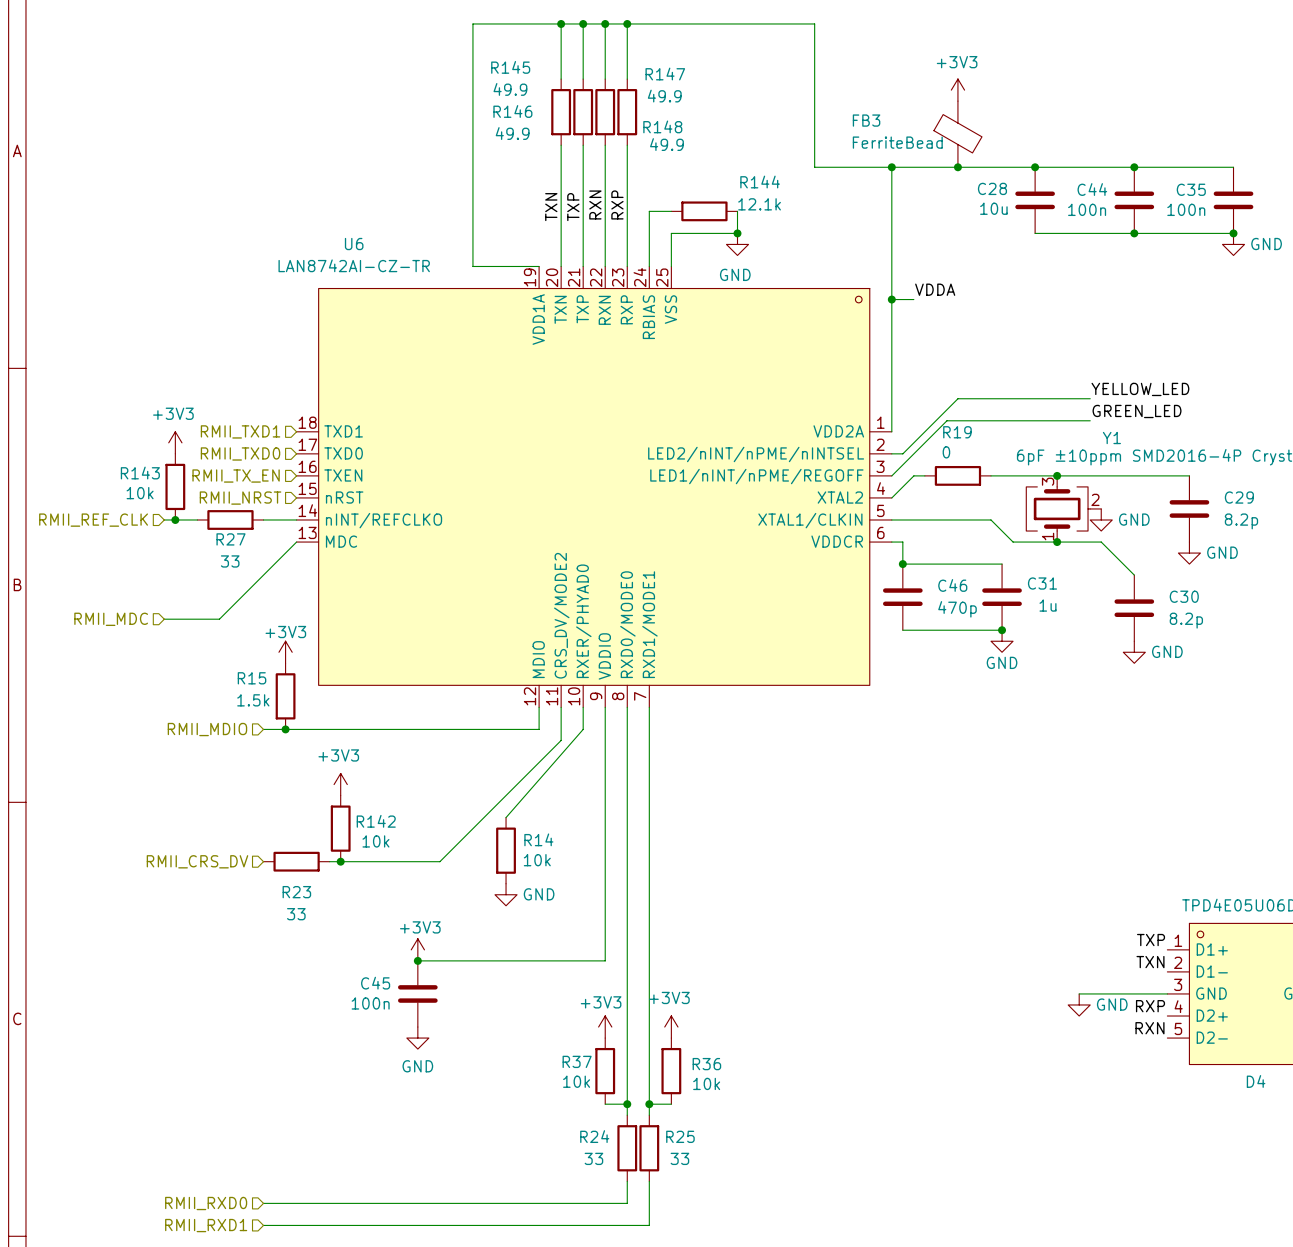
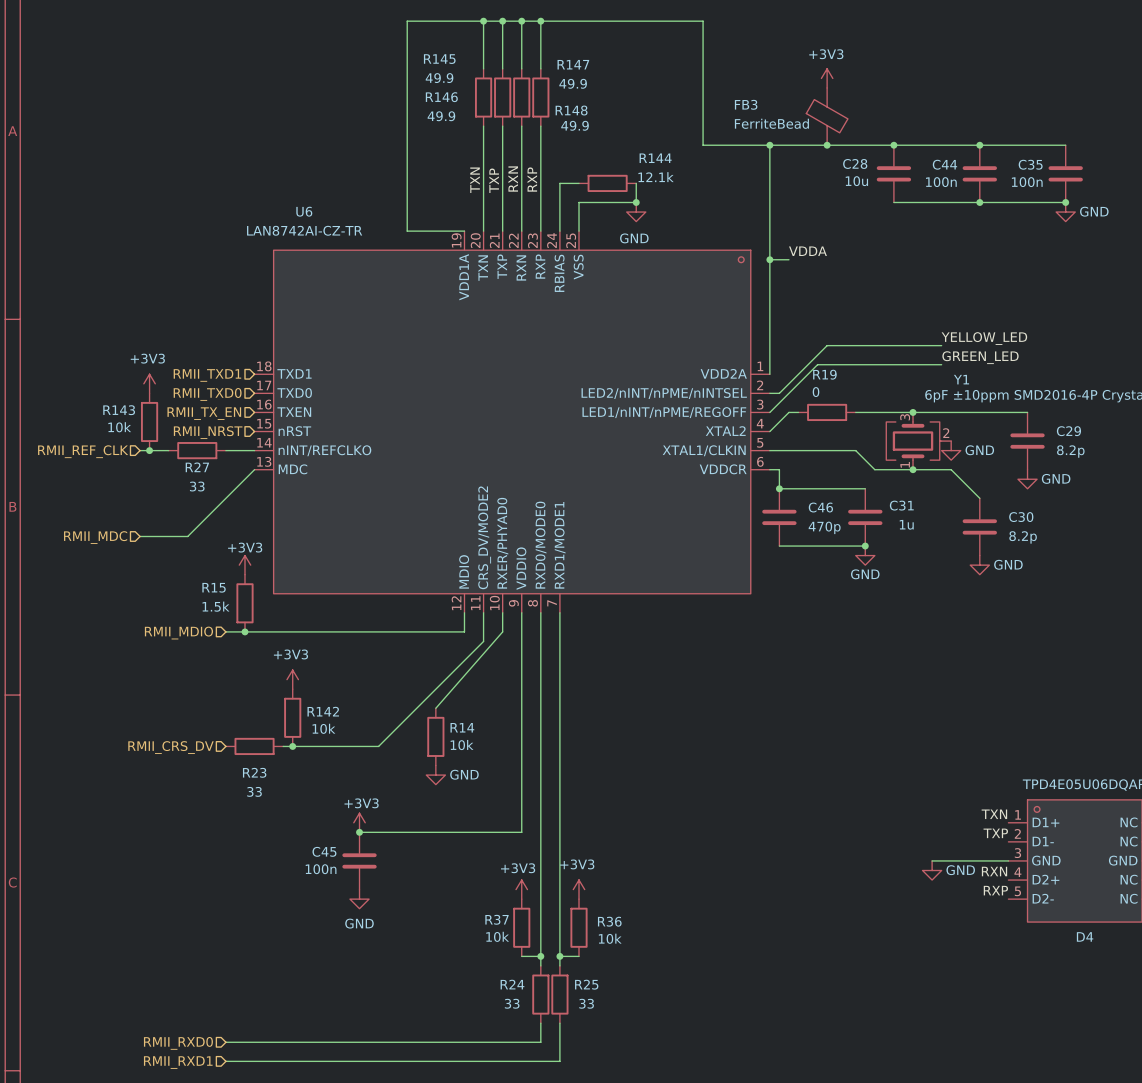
label: TXP (1151, 940) -> TXN (994, 814)
label: TXN (1150, 962) -> TXP (995, 833)
label: RXP (1150, 1006) -> RXN (994, 871)
label: RXN (1149, 1028) -> RXP (995, 890)

